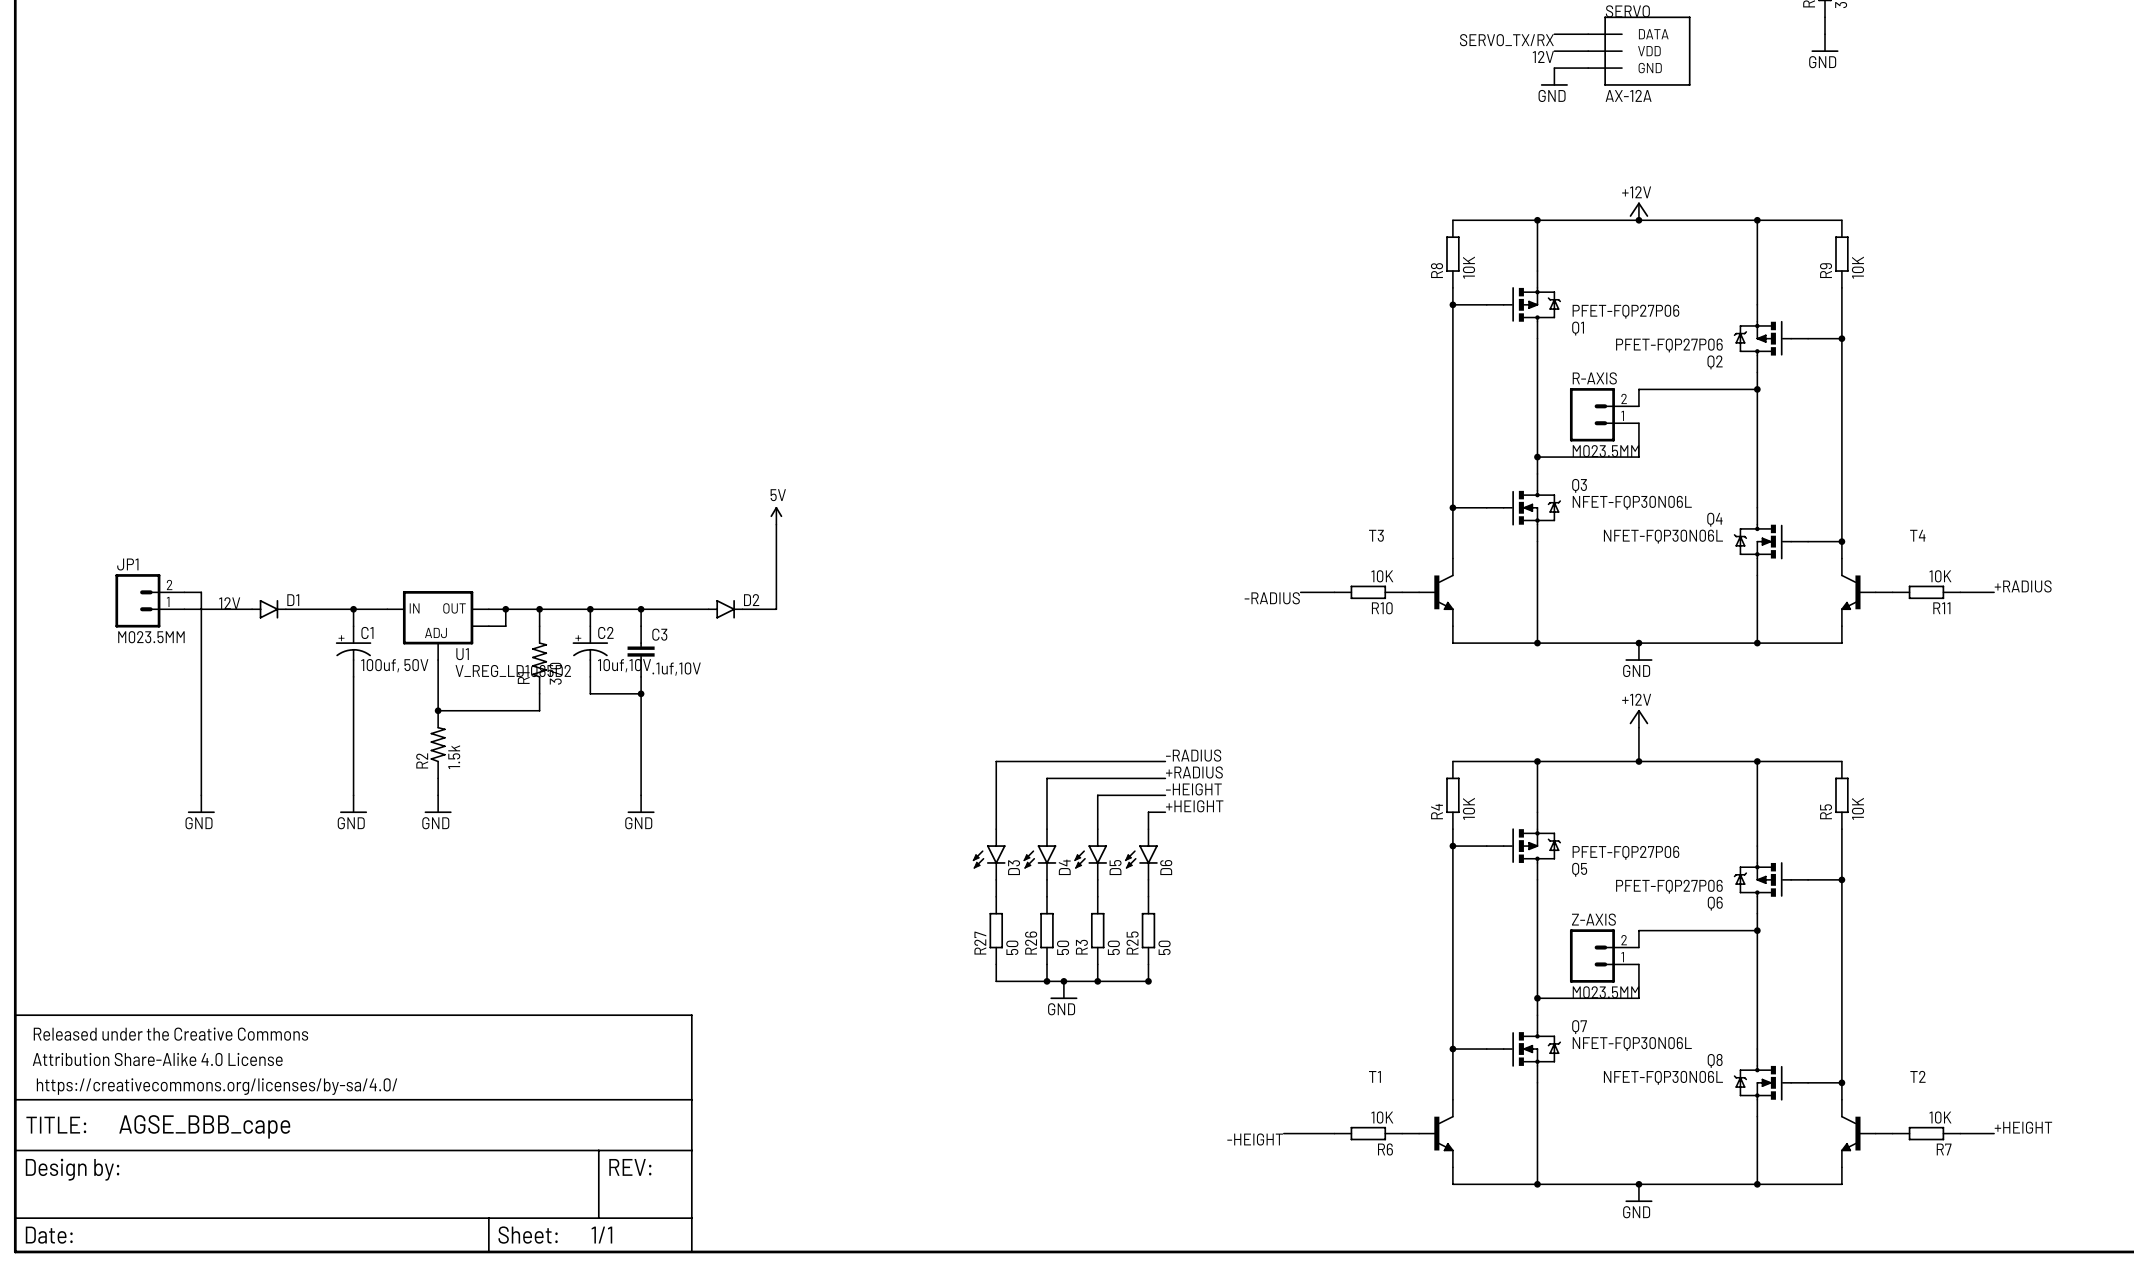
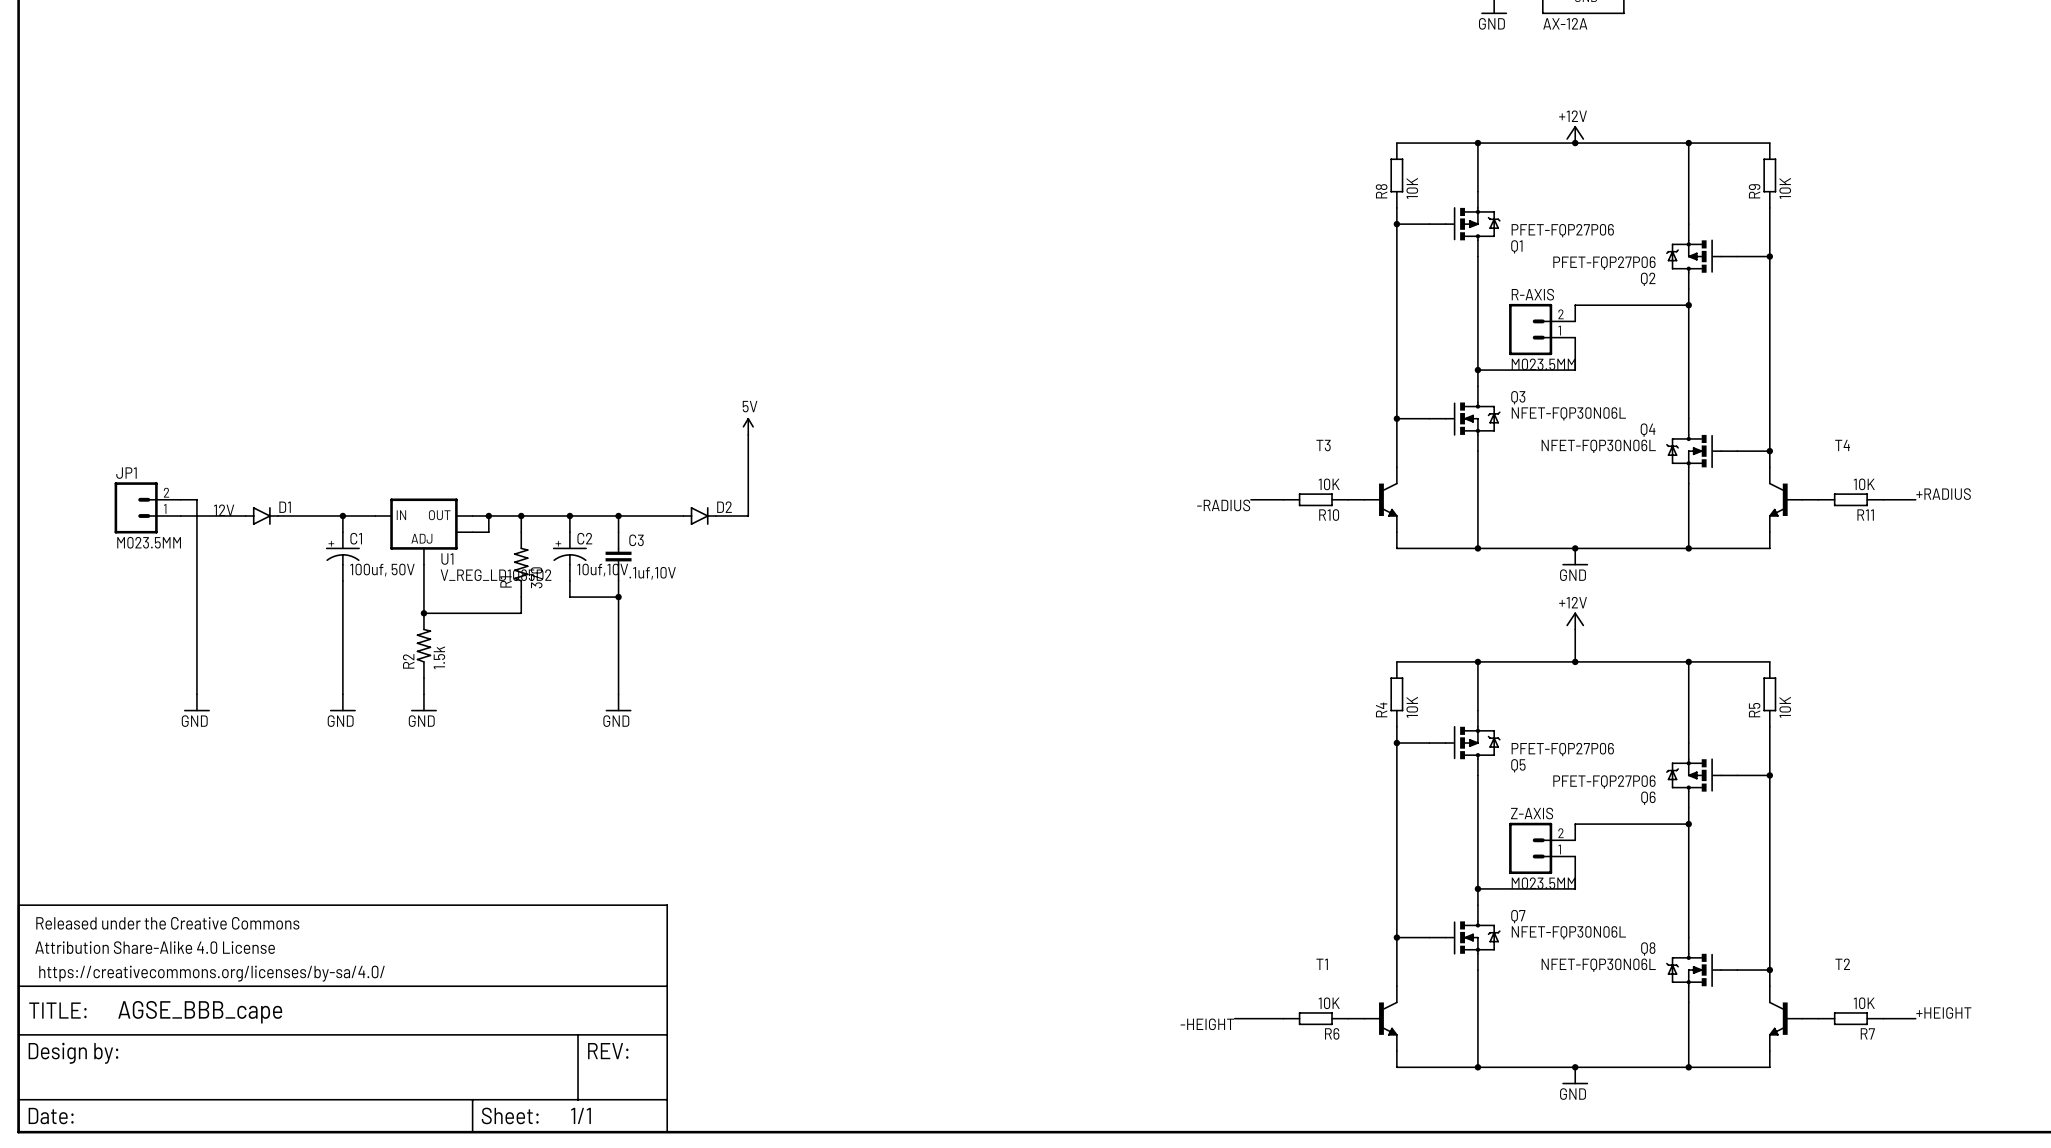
label: -RADIUS (1193, 755) -> none
wire: (1165, 761) (996, 761) (996, 829) -> none
label: +RADIUS (1194, 772) -> none
wire: (1165, 778) (1046, 778) (1046, 829) -> none
label: -HEIGHT (1193, 789) -> none
wire: (1165, 795) (1097, 795) (1097, 829) -> none
label: +HEIGHT (1194, 806) -> none
wire: (1165, 812) (1148, 812) (1148, 829) -> none
D3: (989, 854) -> none
D4: (1039, 854) -> none
D5: (1090, 854) -> none
D6: (1141, 854) -> none
wire: (996, 879) (996, 896) -> none
wire: (1046, 879) (1046, 896) -> none
wire: (1097, 879) (1097, 896) -> none
wire: (1148, 879) (1148, 896) -> none
R27: 50 (996, 930) -> none
R26: 50 (1046, 930) -> none
R3: 50 (1097, 930) -> none
R25: 50 (1148, 930) -> none
wire: (996, 964) (996, 981) (1148, 981) (1148, 964) -> none
wire: (1046, 964) (1046, 981) -> none
wire: (1097, 964) (1097, 981) -> none
junction: (1046, 981) -> none
junction: (1063, 981) -> none
junction: (1097, 981) -> none
junction: (1148, 981) -> none
power symbol: GND (1063, 990) -> none

